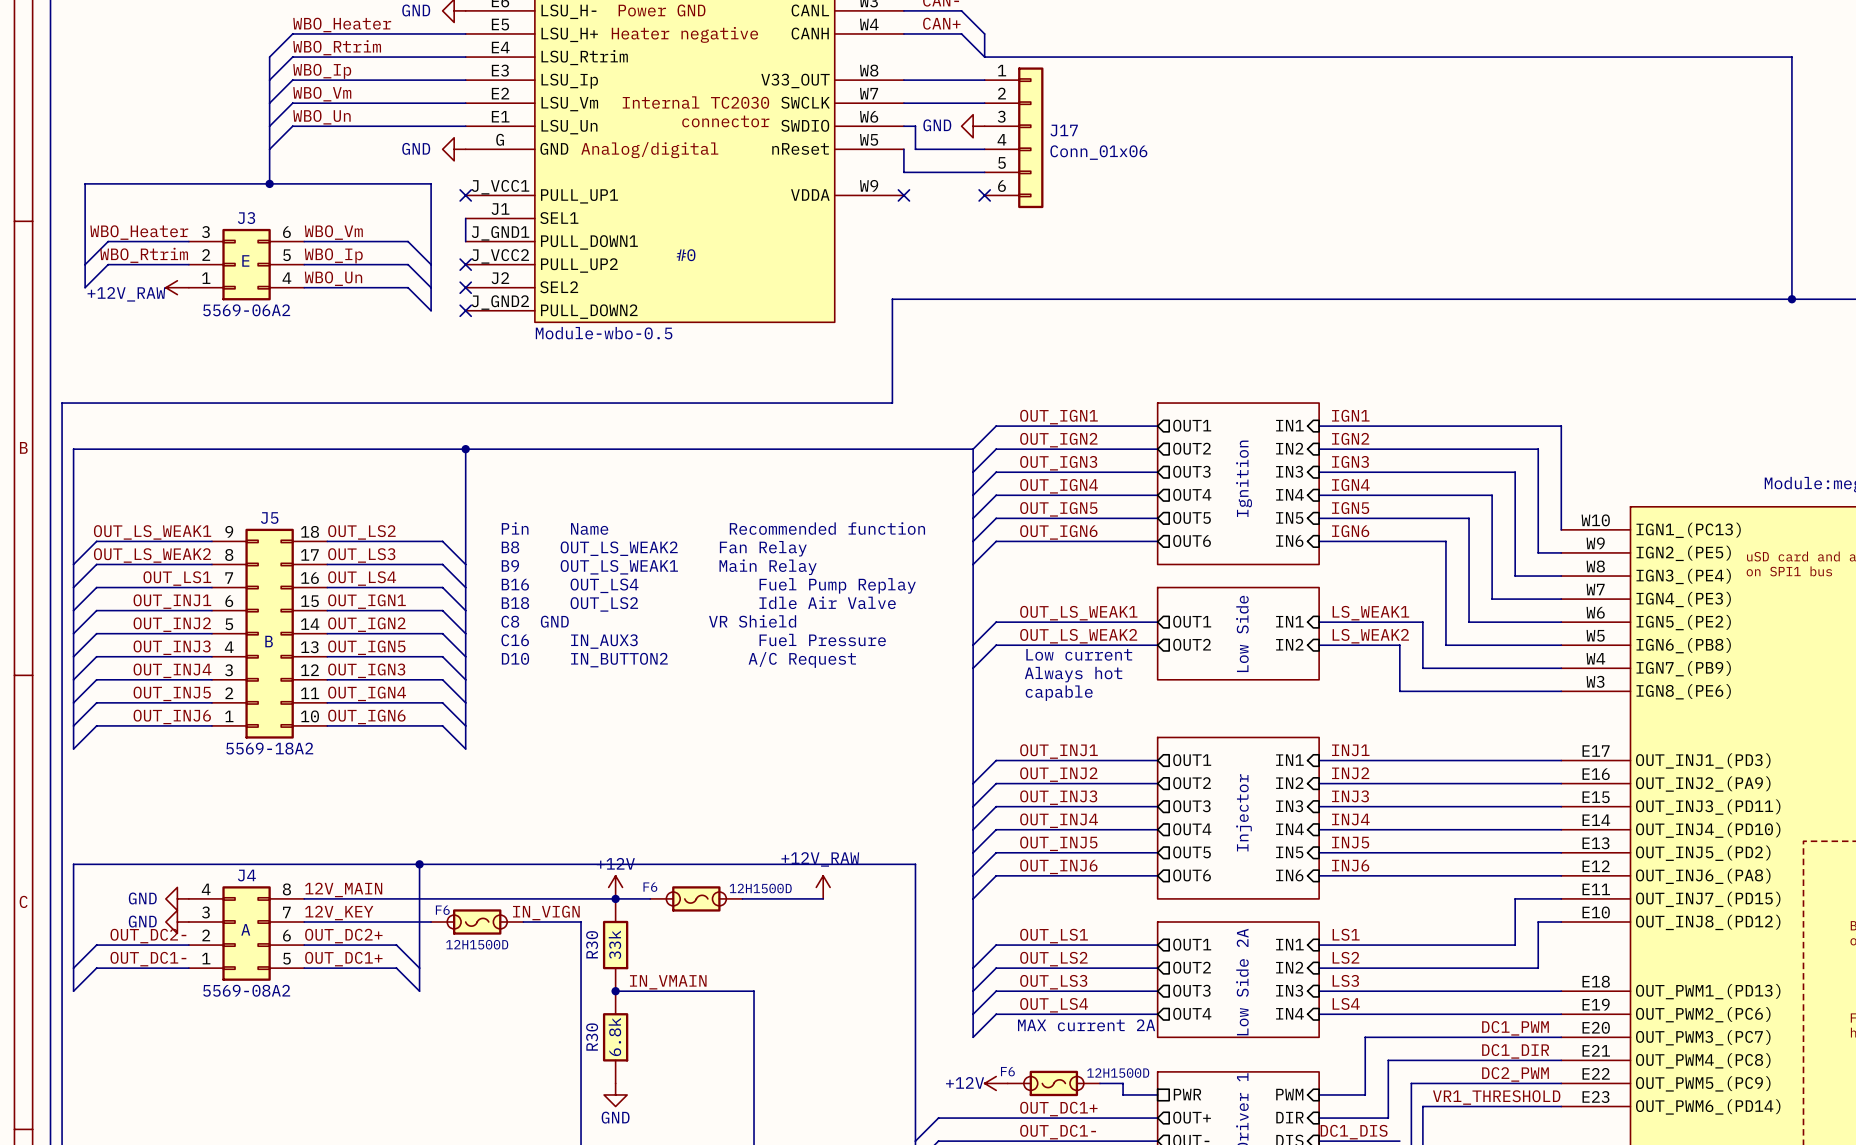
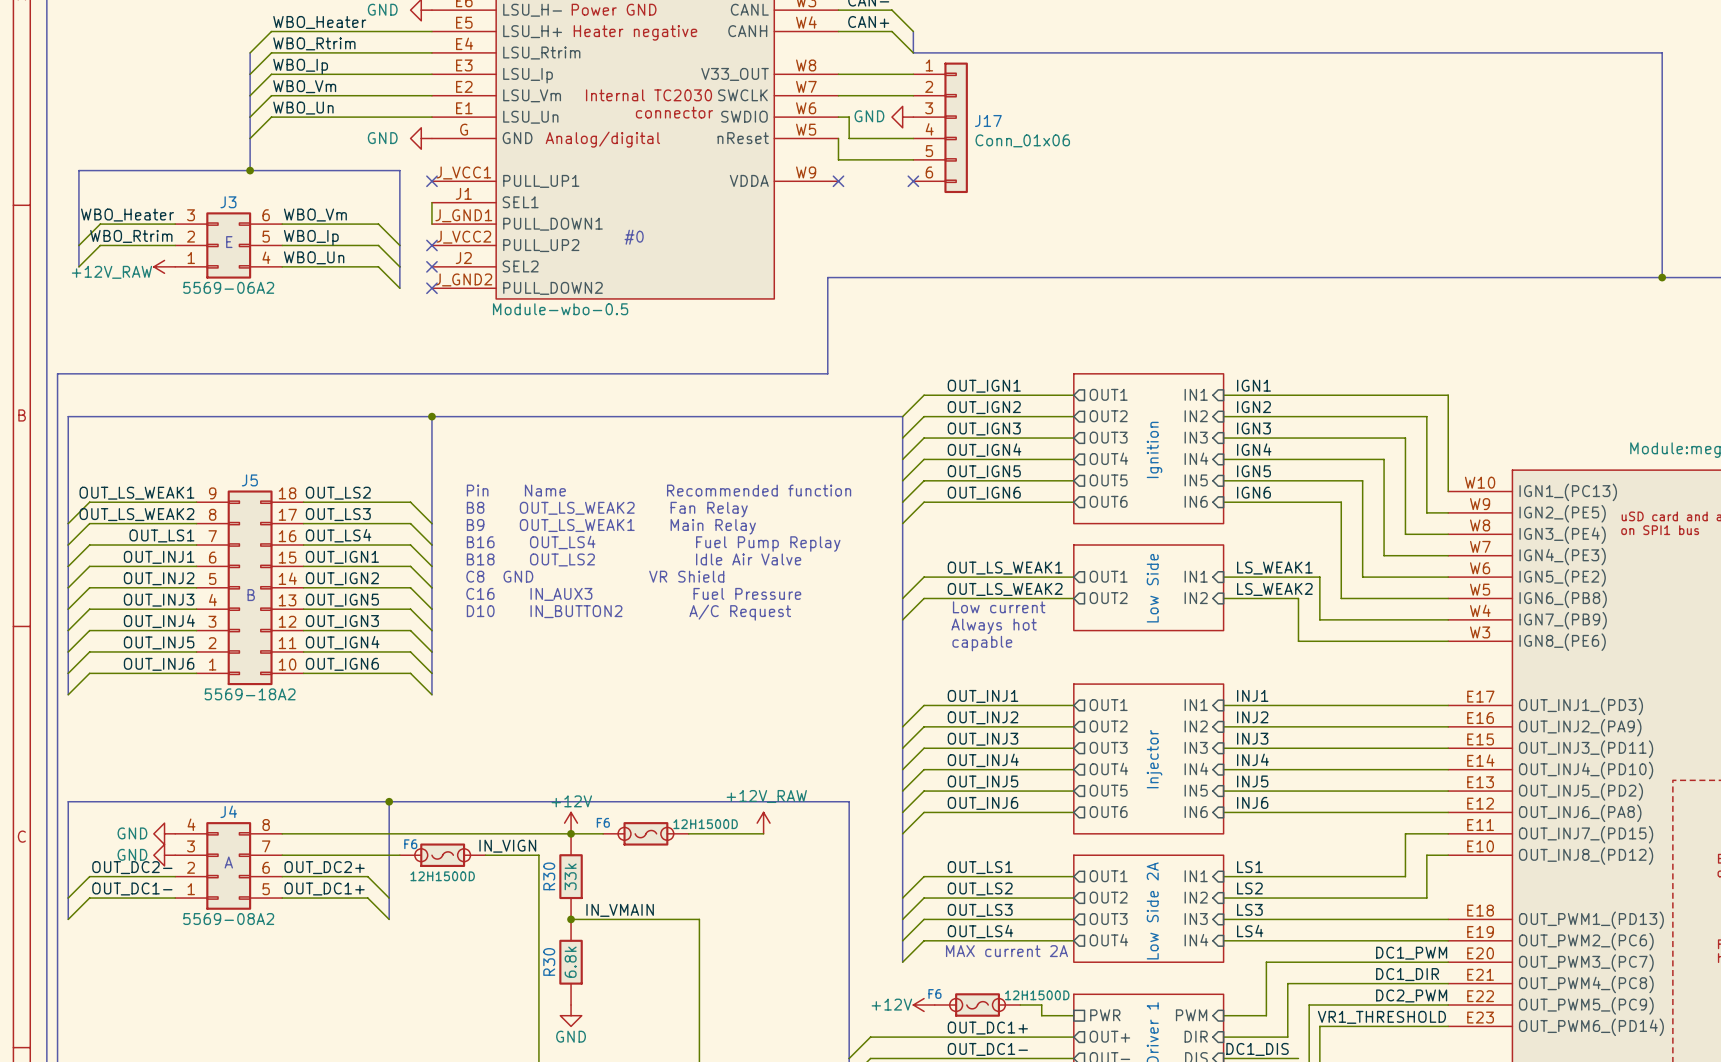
label: 12V_MAIN (343, 889) -> none
label: 12V_KEY (339, 913) -> none

